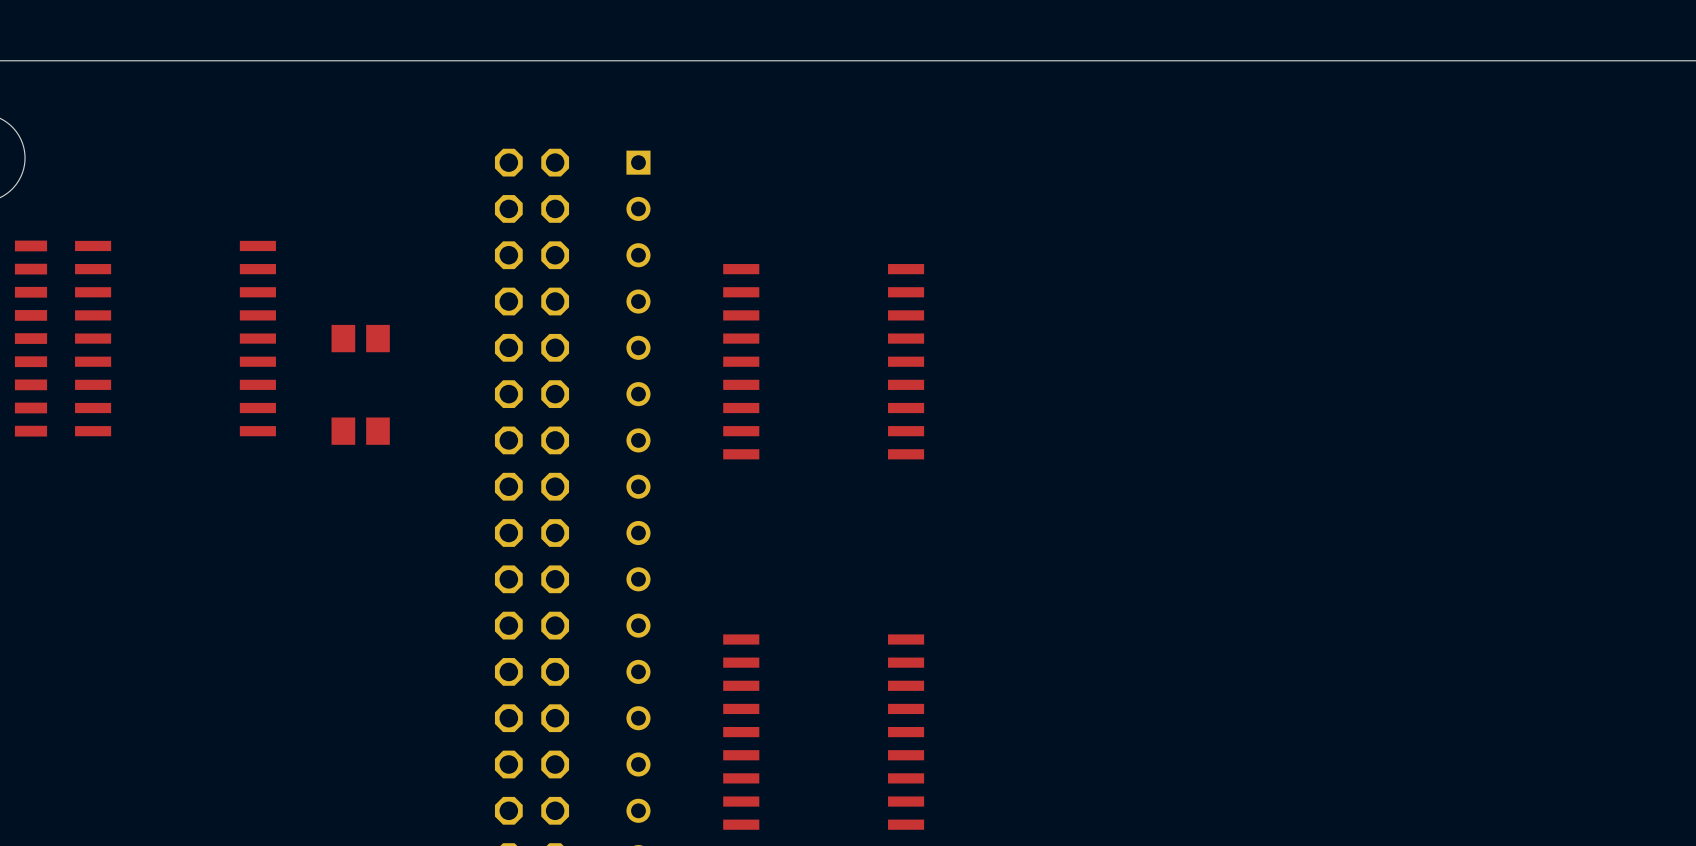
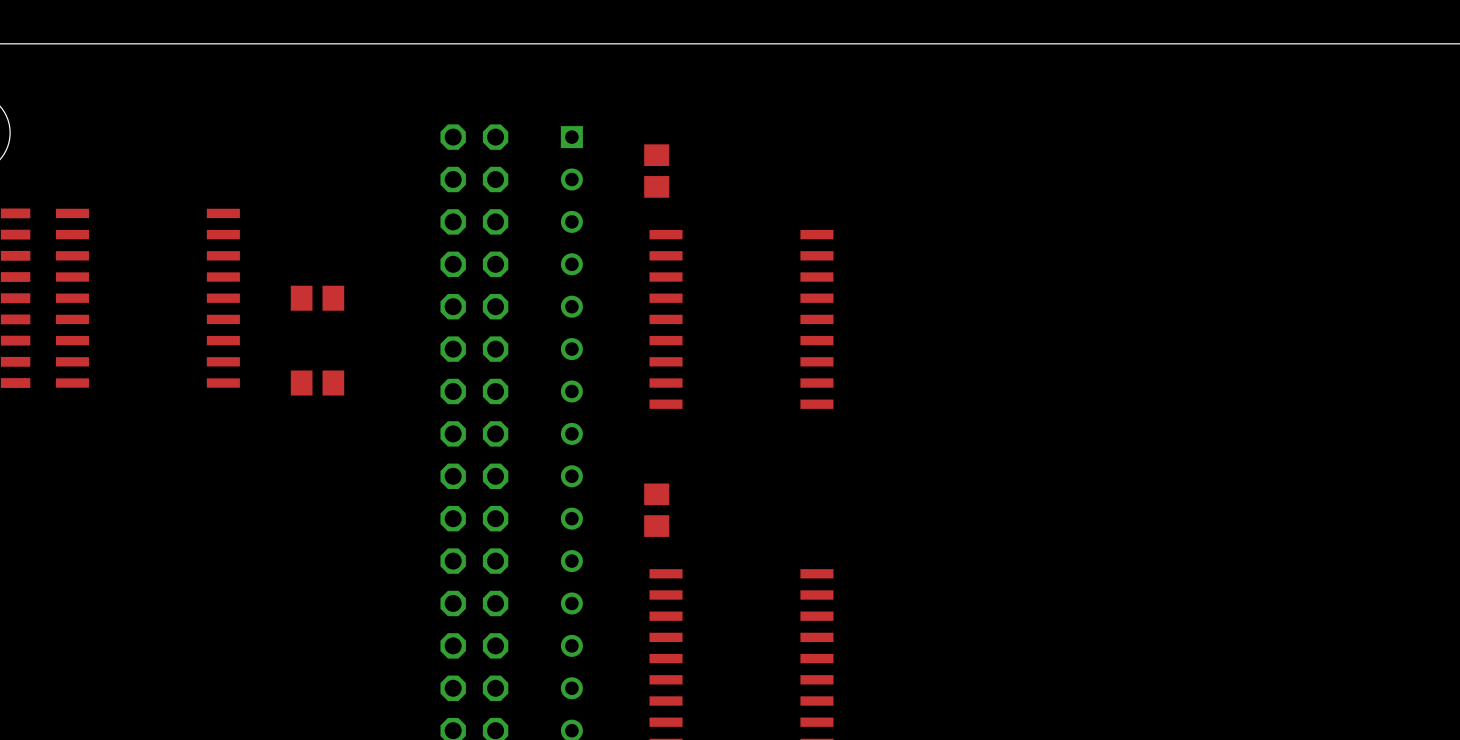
part: none -> (656, 171)
part: none -> (656, 510)

